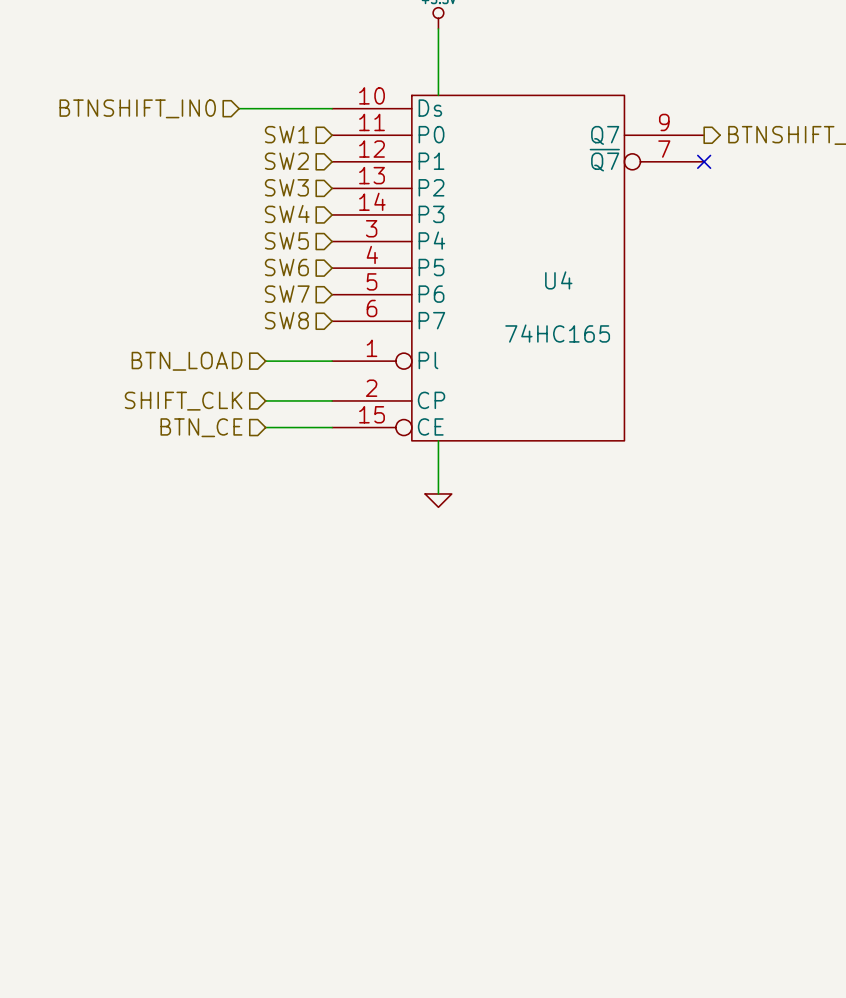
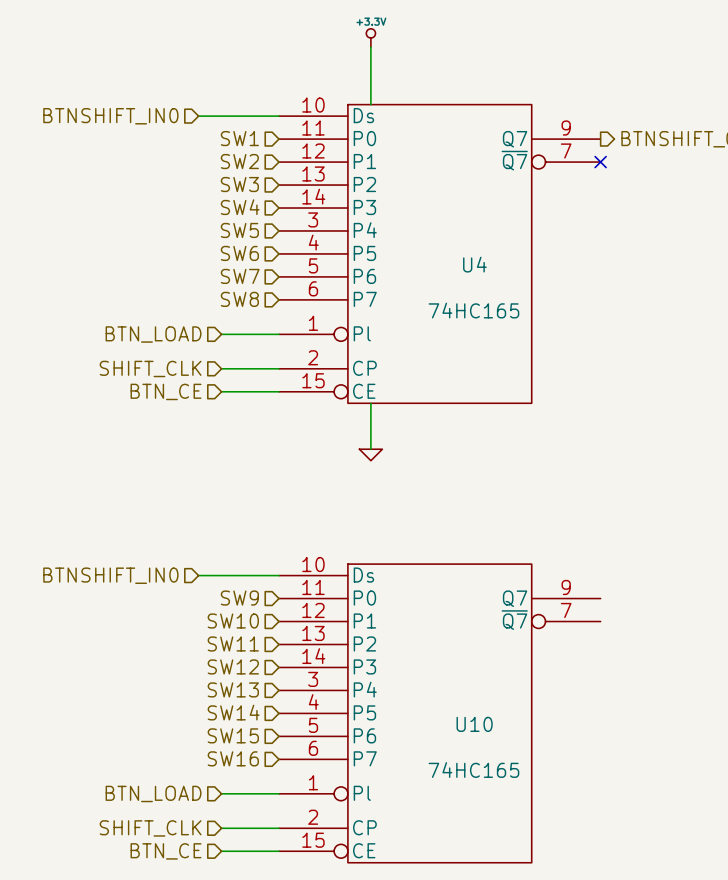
hierarchical label: none -> BTNSHIFT_IN0 (110, 575)
wire: none -> (198, 575) (279, 575)
hierarchical label: none -> SW9 (239, 598)
hierarchical label: none -> SW10 (233, 621)
hierarchical label: none -> SW11 (233, 643)
hierarchical label: none -> SW12 (233, 666)
hierarchical label: none -> SW13 (233, 689)
hierarchical label: none -> SW14 (233, 712)
U10: none -> 74HC165 (439, 713)
hierarchical label: none -> SW15 (233, 735)
hierarchical label: none -> SW16 (233, 758)
hierarchical label: none -> BTN_LOAD (153, 793)
wire: none -> (221, 793) (279, 793)
hierarchical label: none -> SHIFT_CLK (150, 828)
wire: none -> (221, 828) (279, 828)
hierarchical label: none -> BTN_CE (166, 851)
wire: none -> (221, 851) (279, 851)

